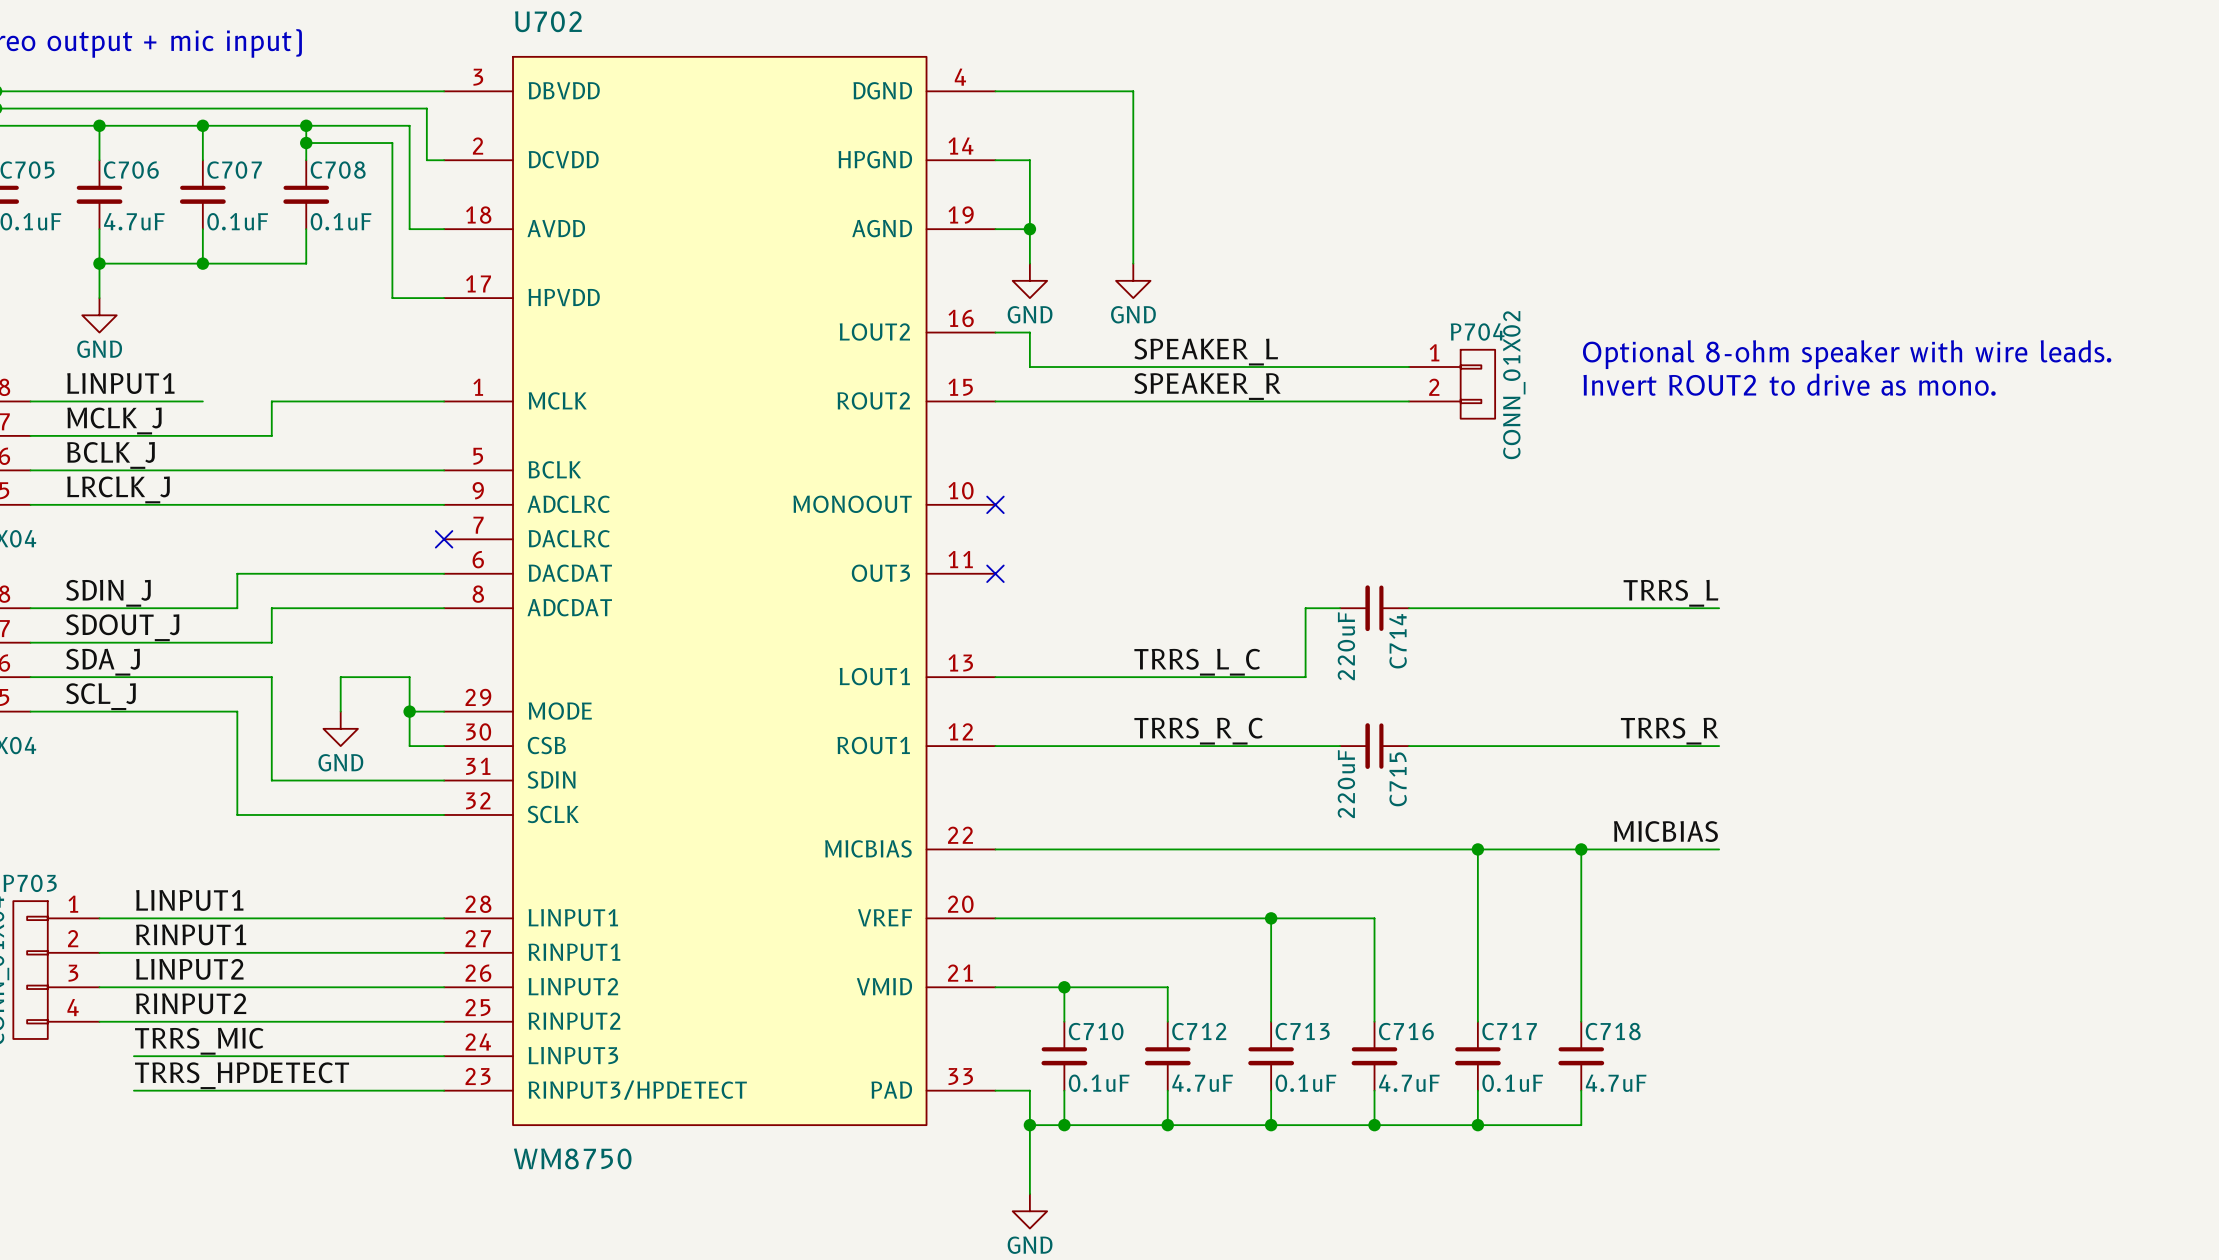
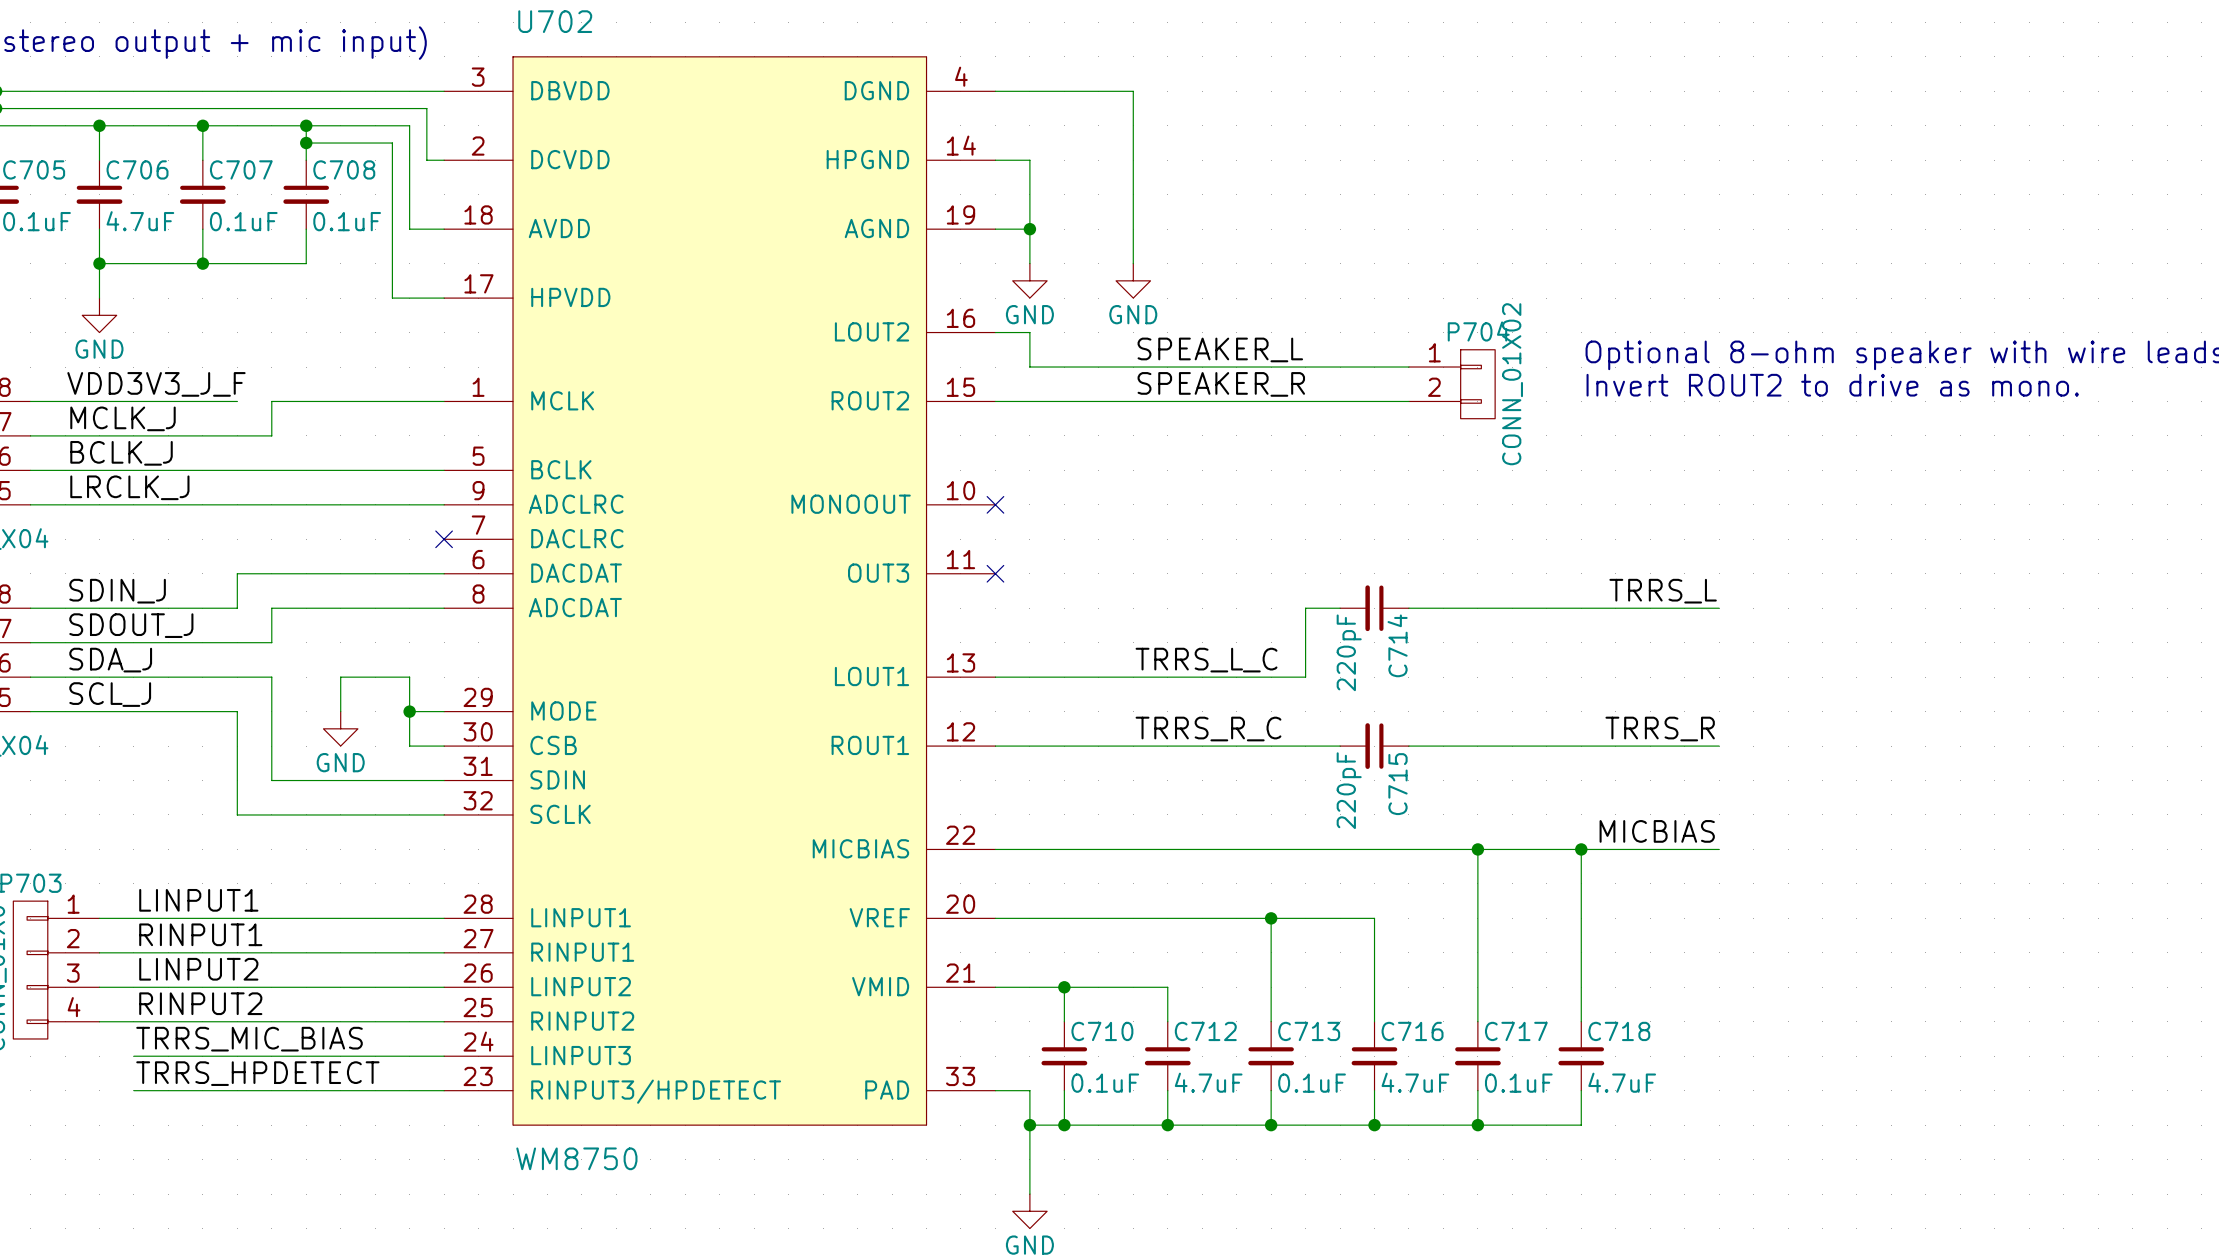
label: LINPUT1 (120, 383) -> VDD3V3_J_F (156, 384)
wire: none -> (202, 401) (237, 401)
C714 value: 220uF (1346, 646) -> 220pF (1349, 652)
C715 value: 220uF (1346, 784) -> 220pF (1349, 790)
label: TRRS_MIC (199, 1041) -> TRRS_MIC_BIAS (249, 1039)

